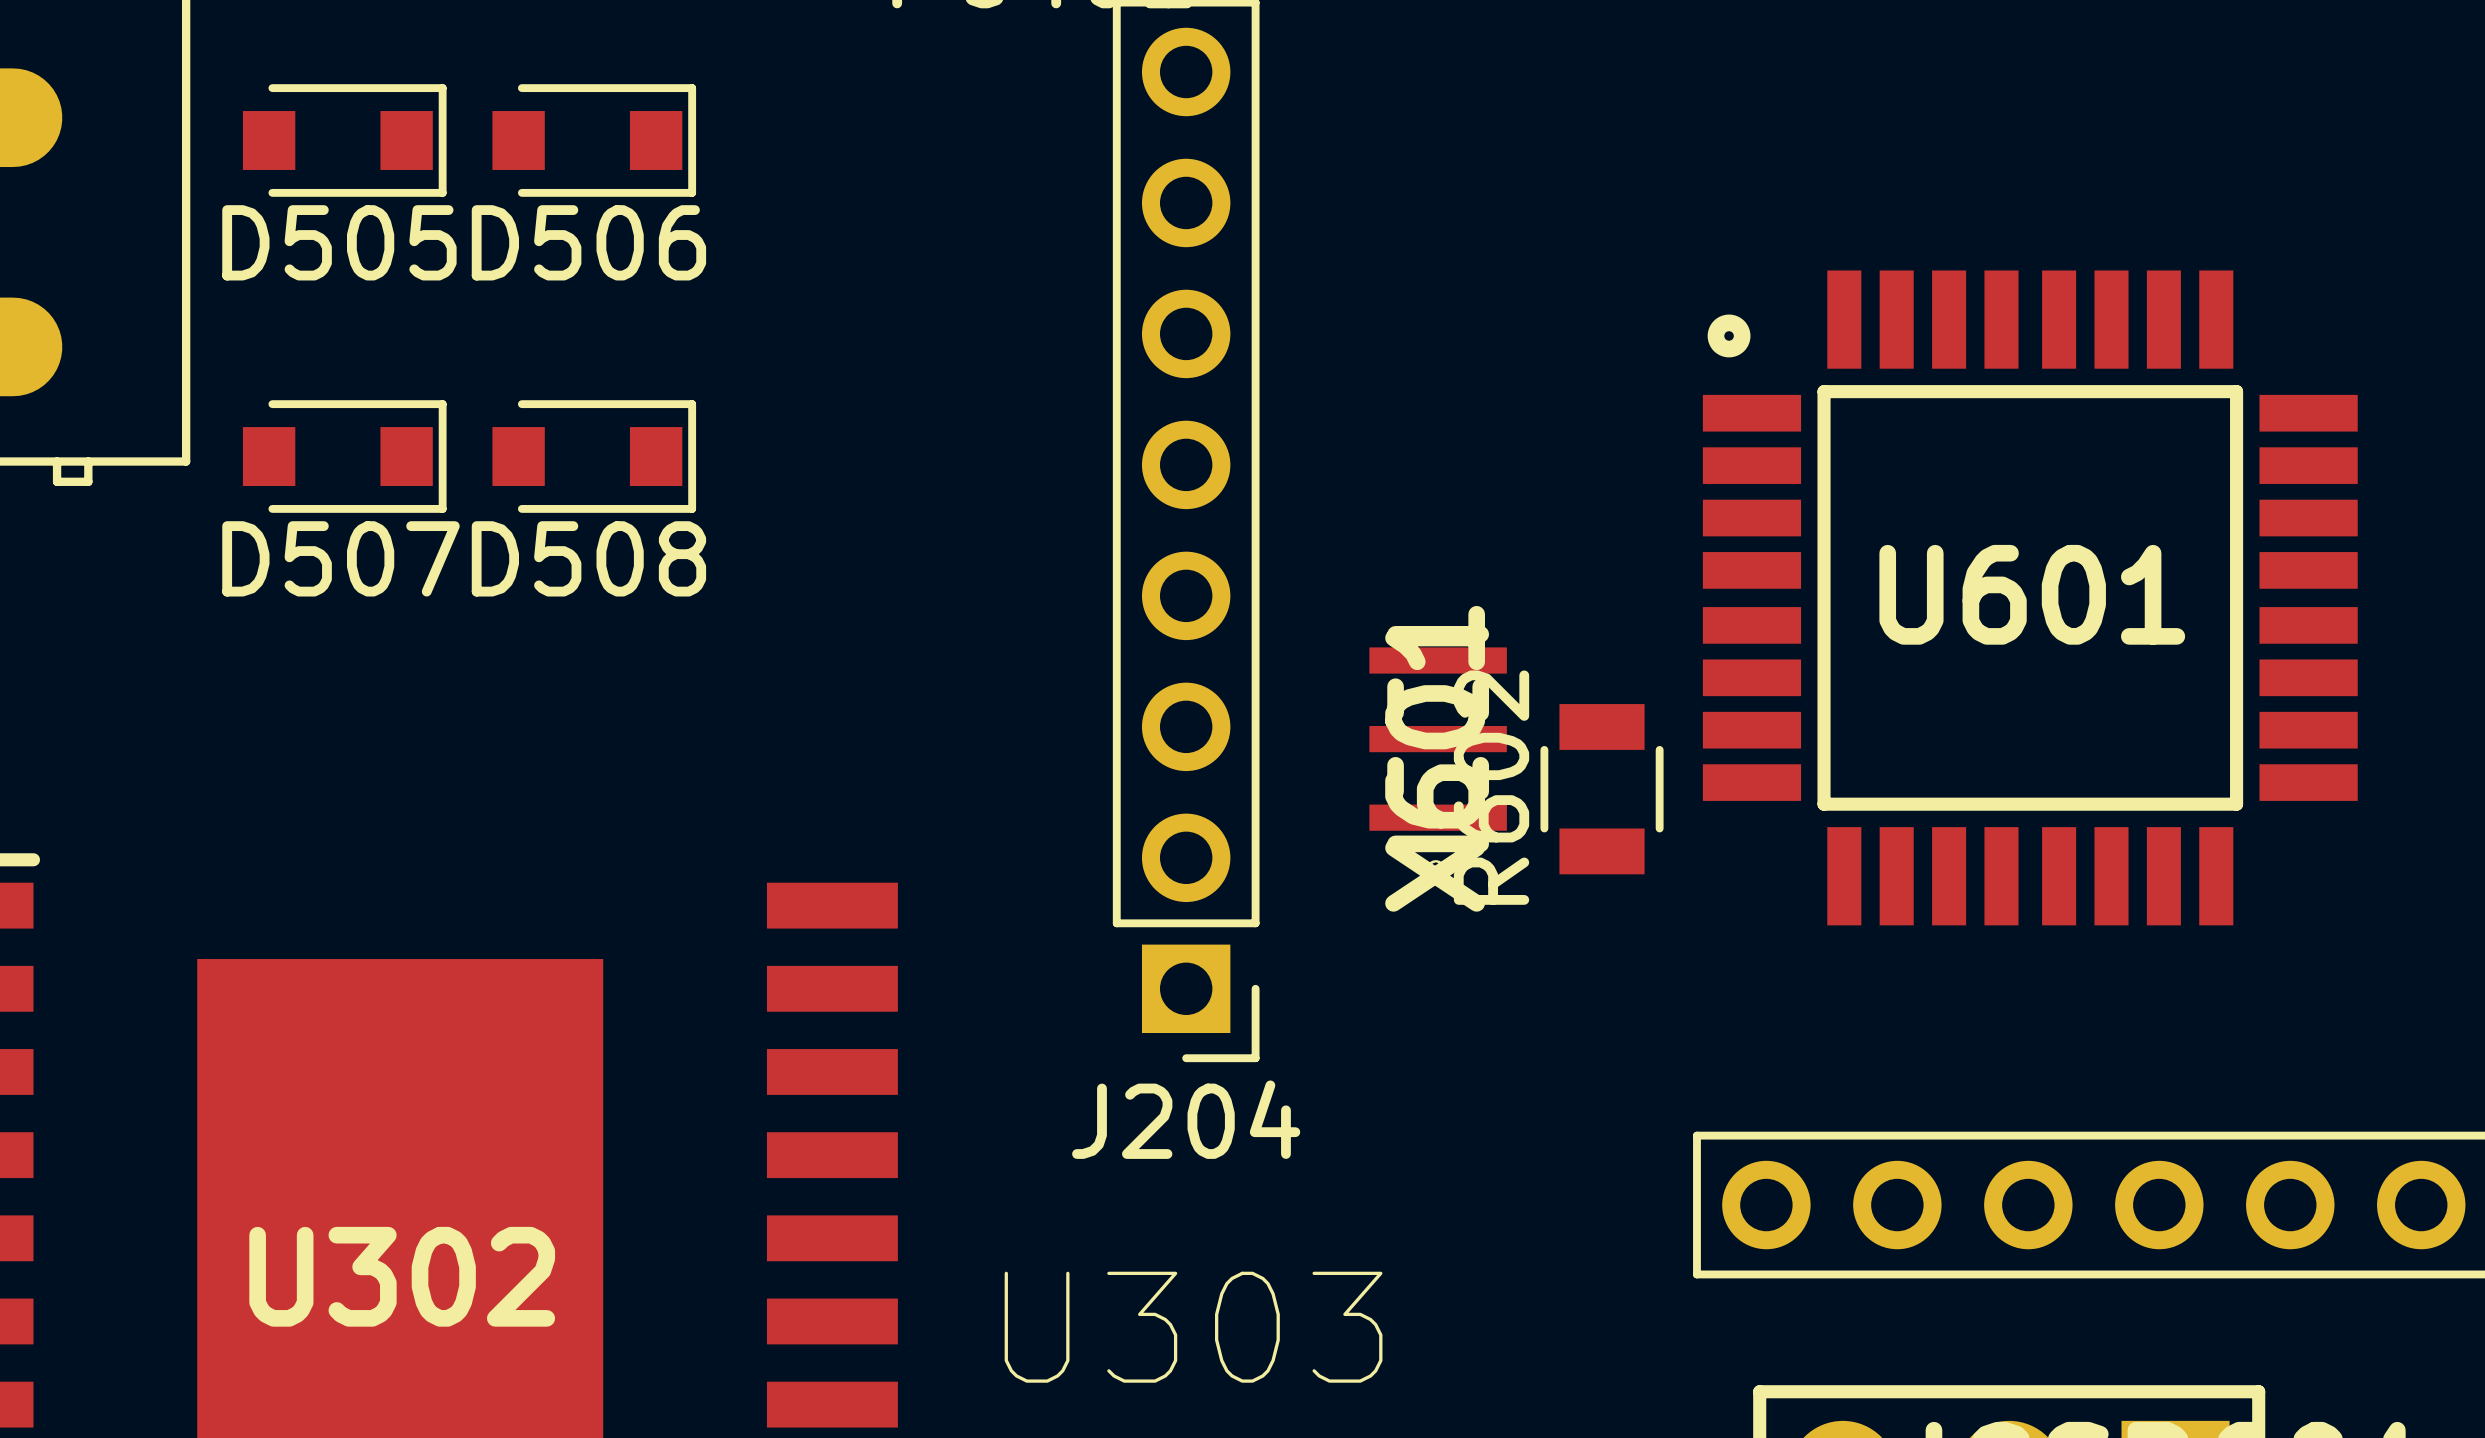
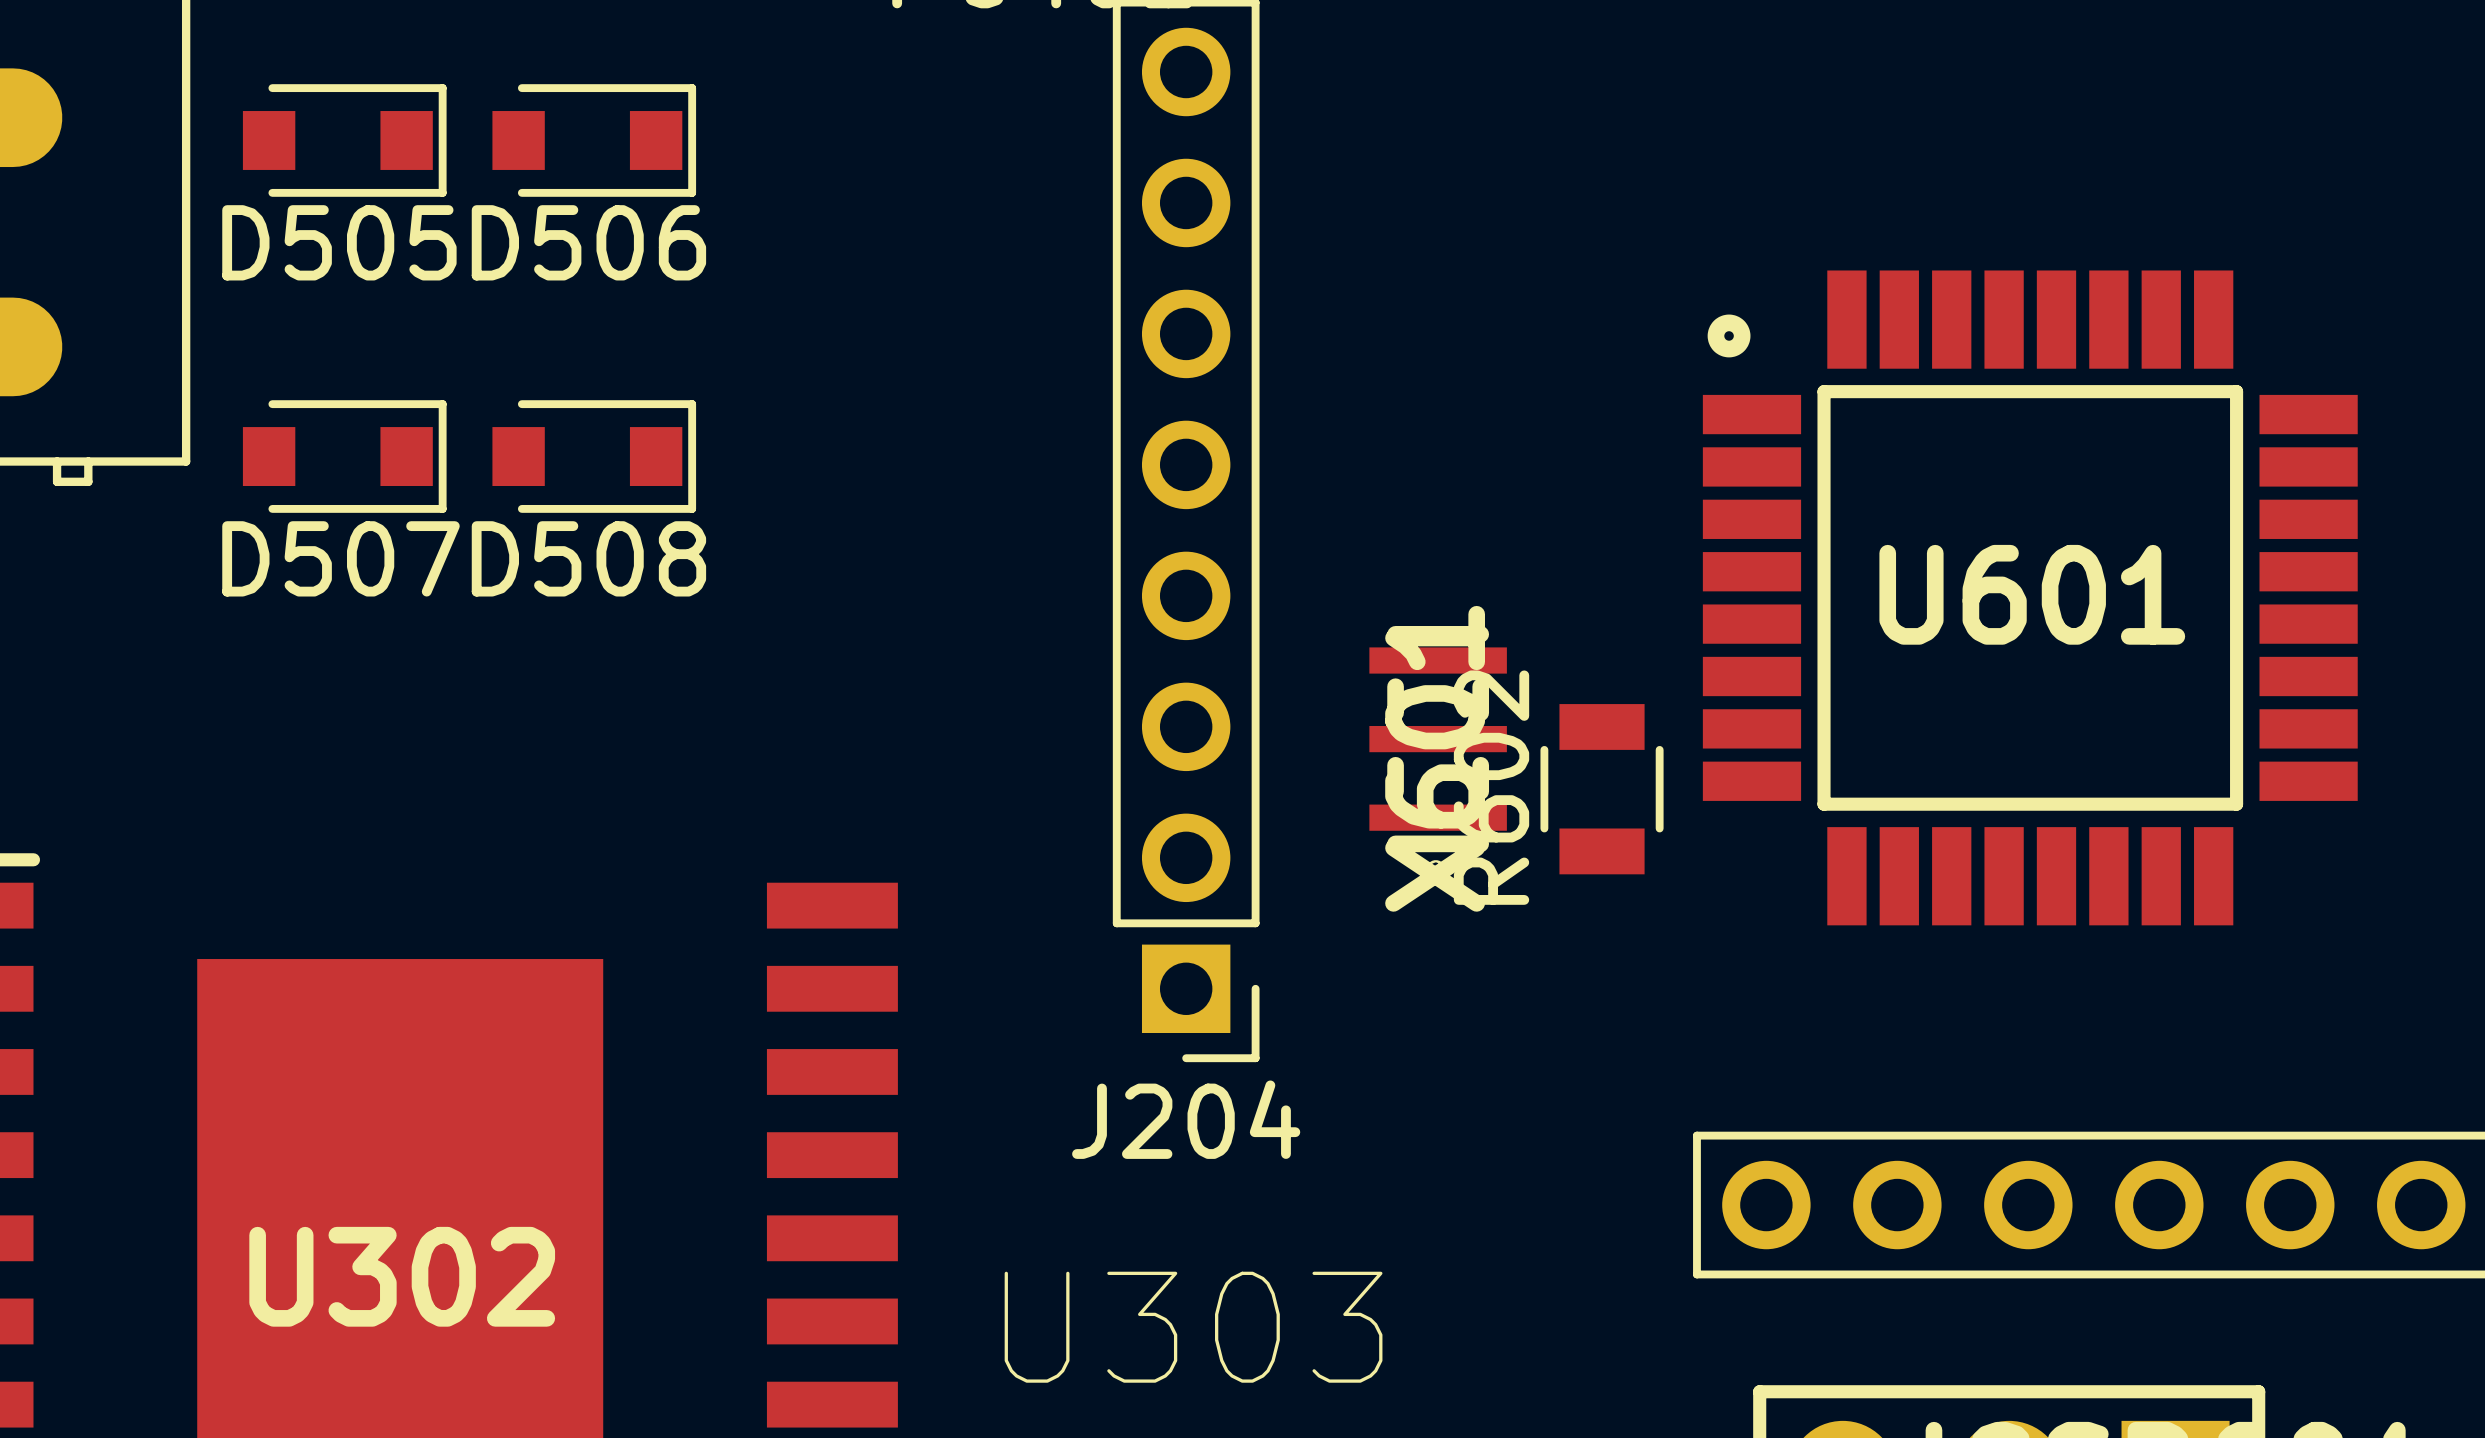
U601 footprint: [1702, 270, 2358, 926] -> [1702, 270, 2358, 926]

